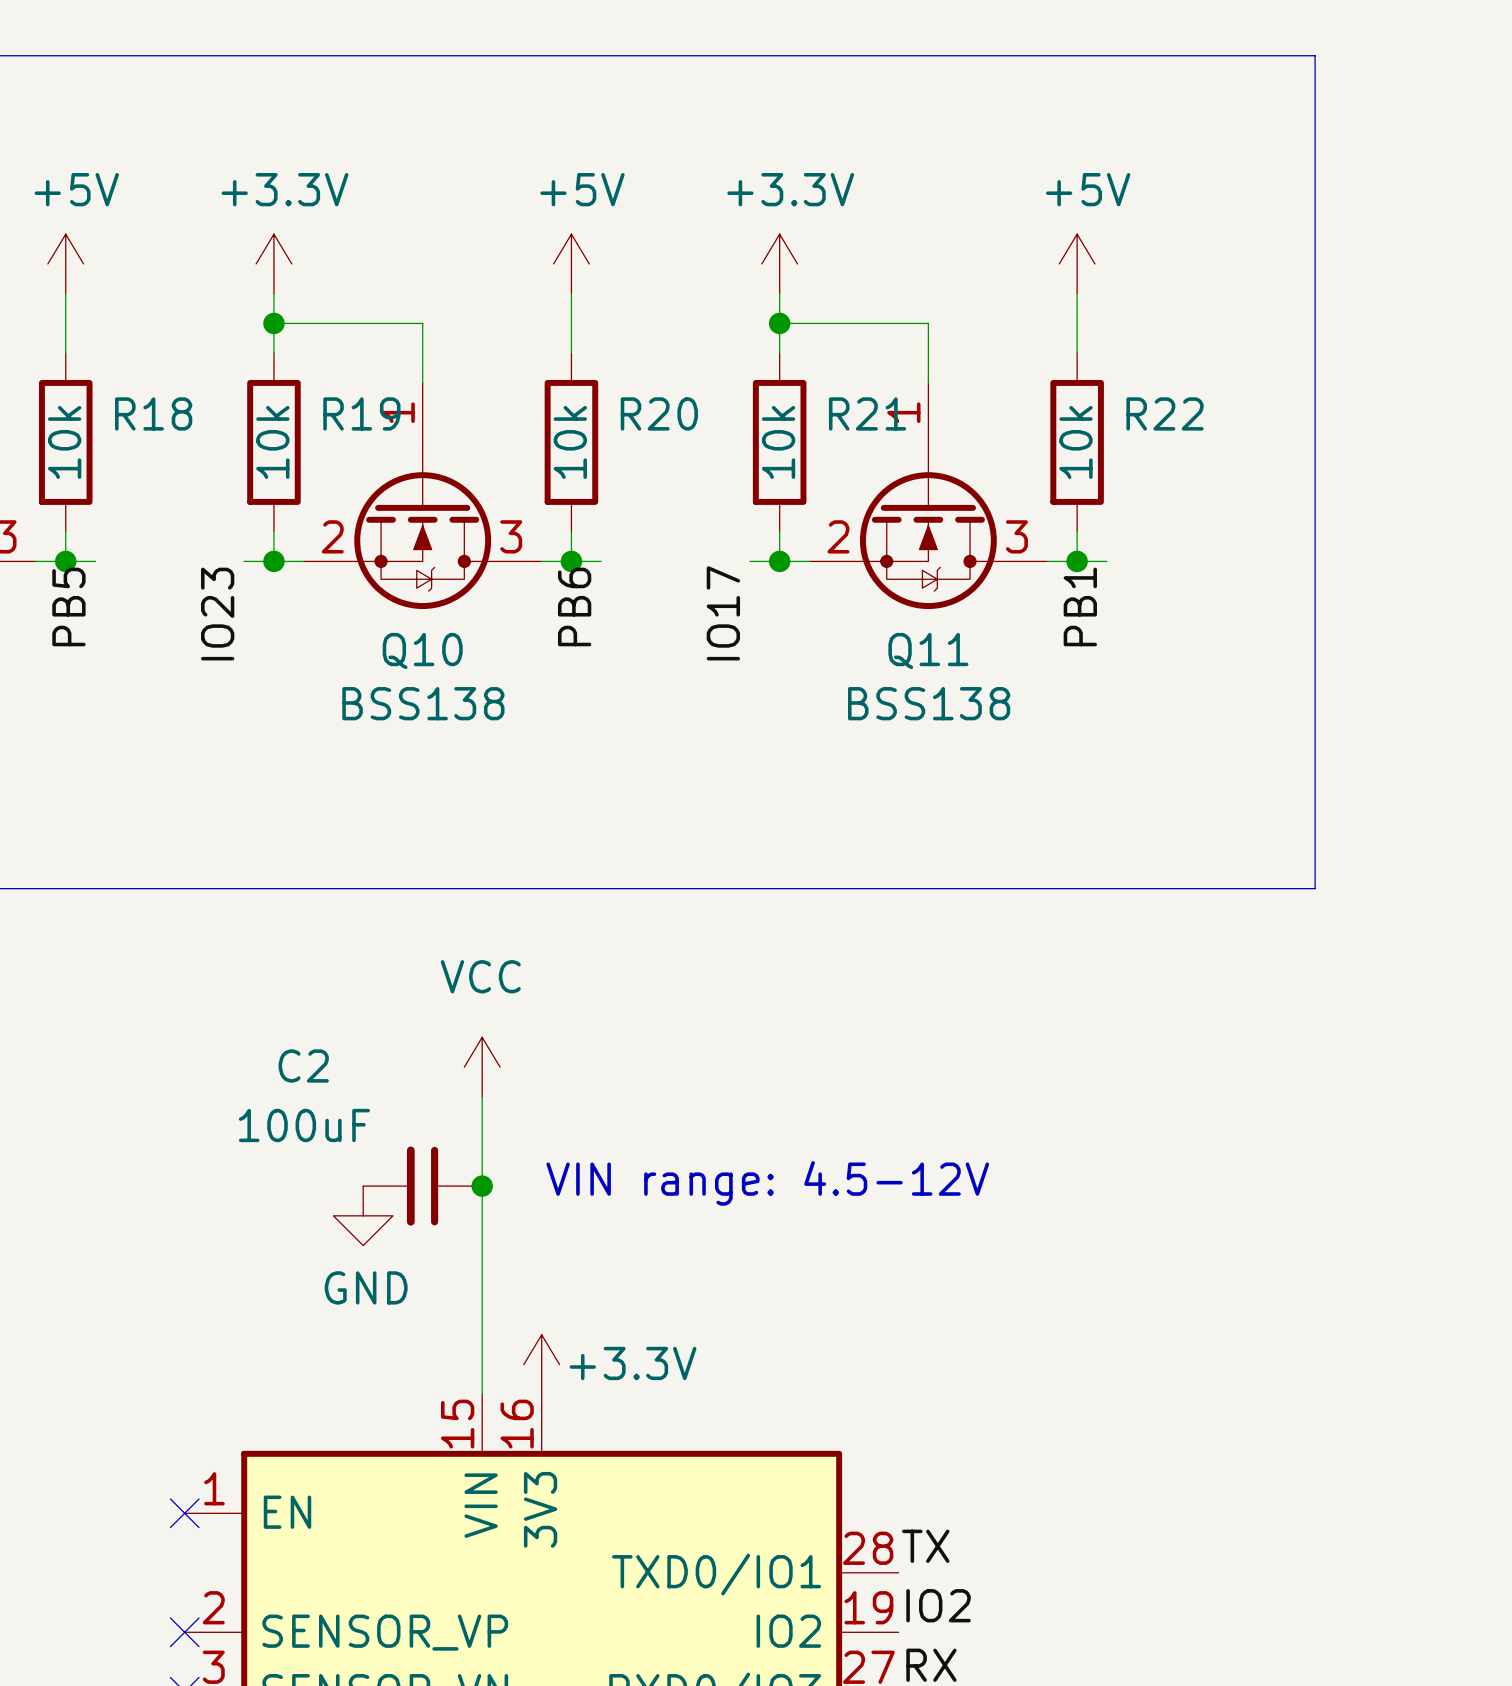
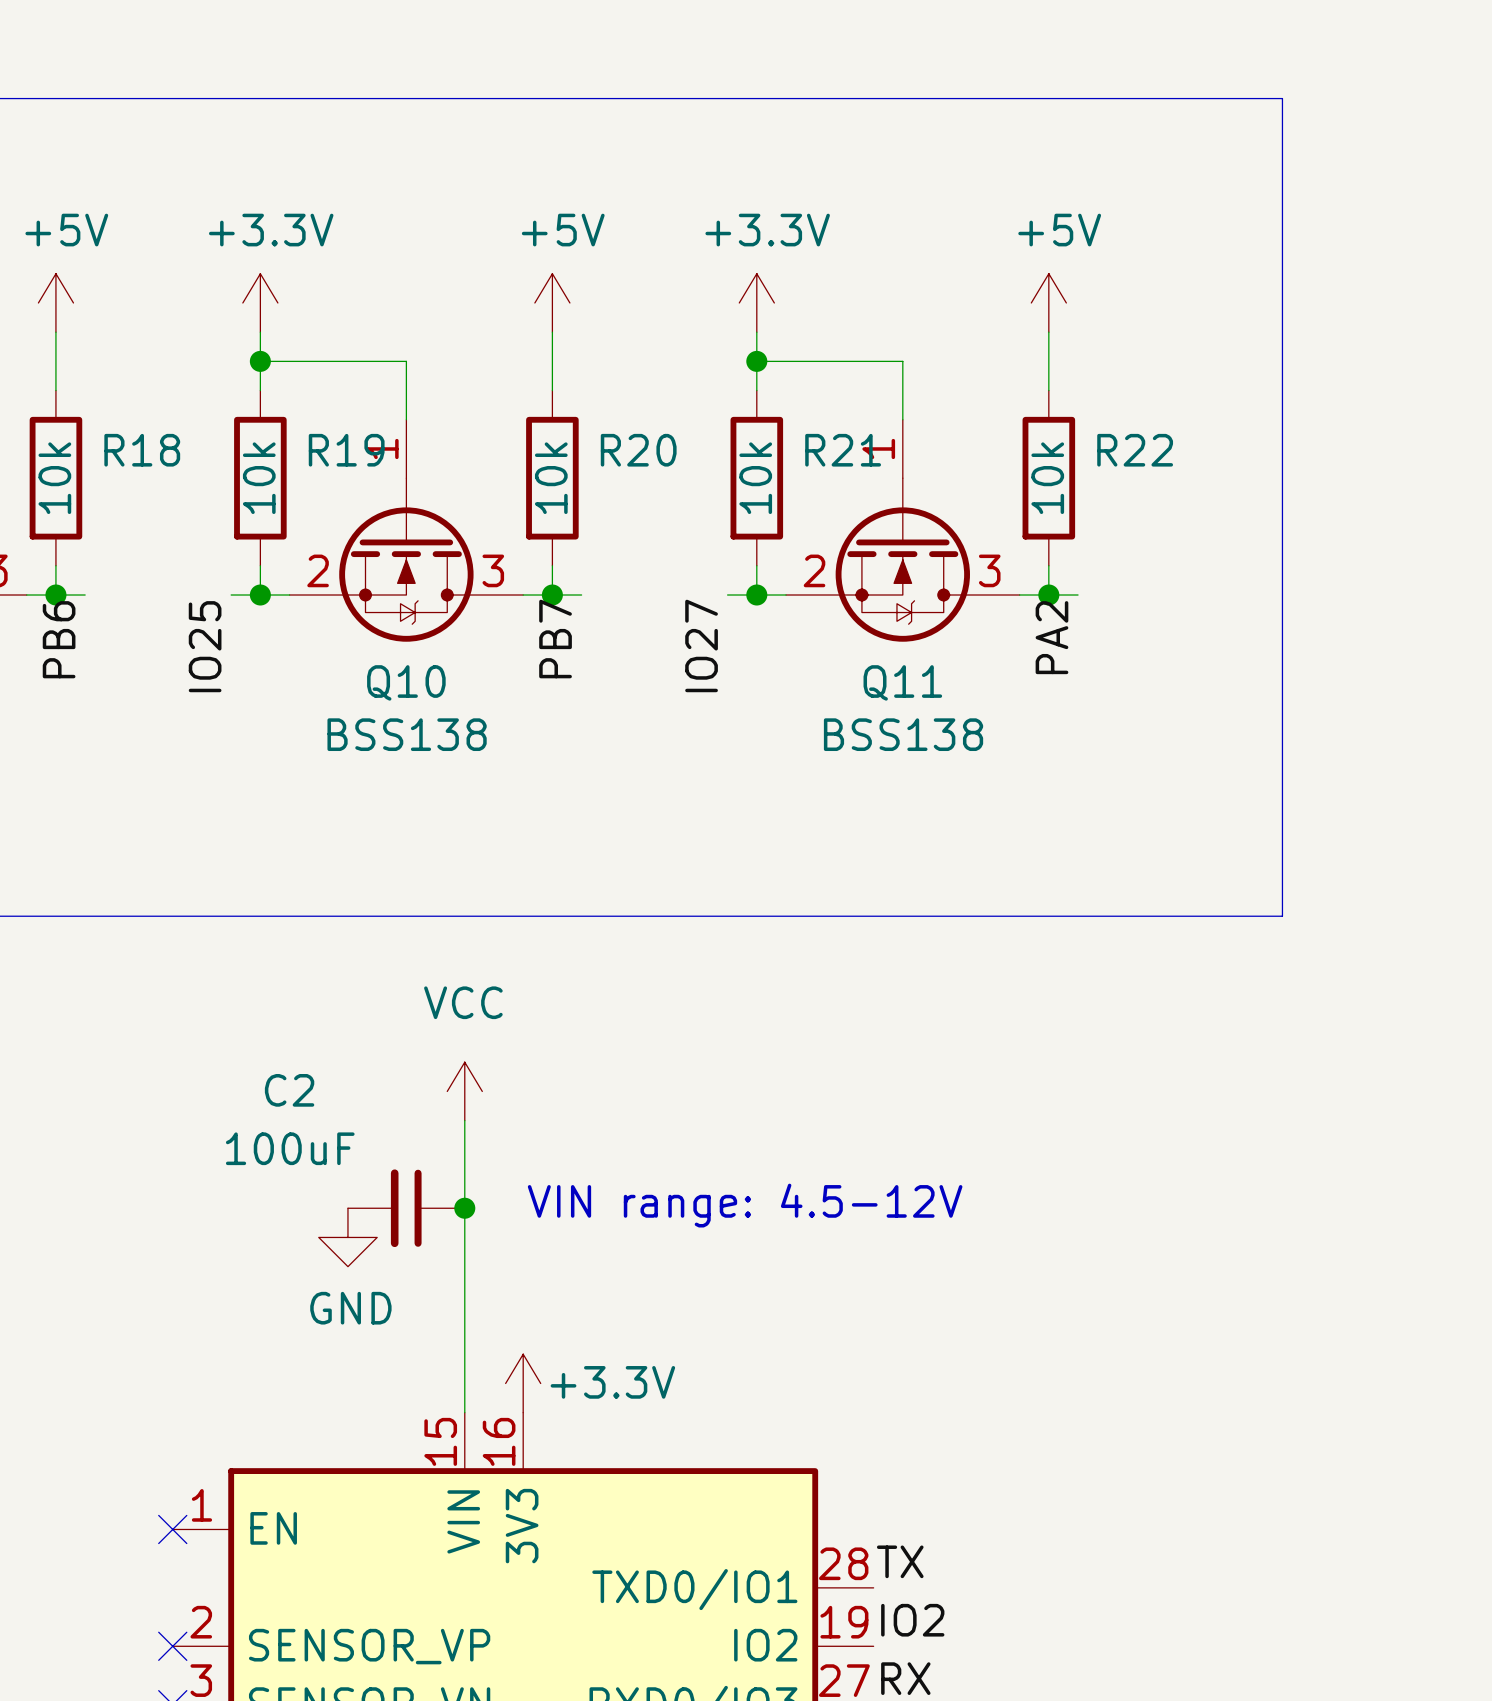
label: PB5 (68, 606) -> PB6 (59, 639)
label: PB6 (574, 606) -> PB7 (555, 639)
label: PB1 (1080, 606) -> PA2 (1051, 637)
label: IO17 (723, 613) -> IO27 (701, 645)
label: IO23 (217, 614) -> IO25 (205, 646)

